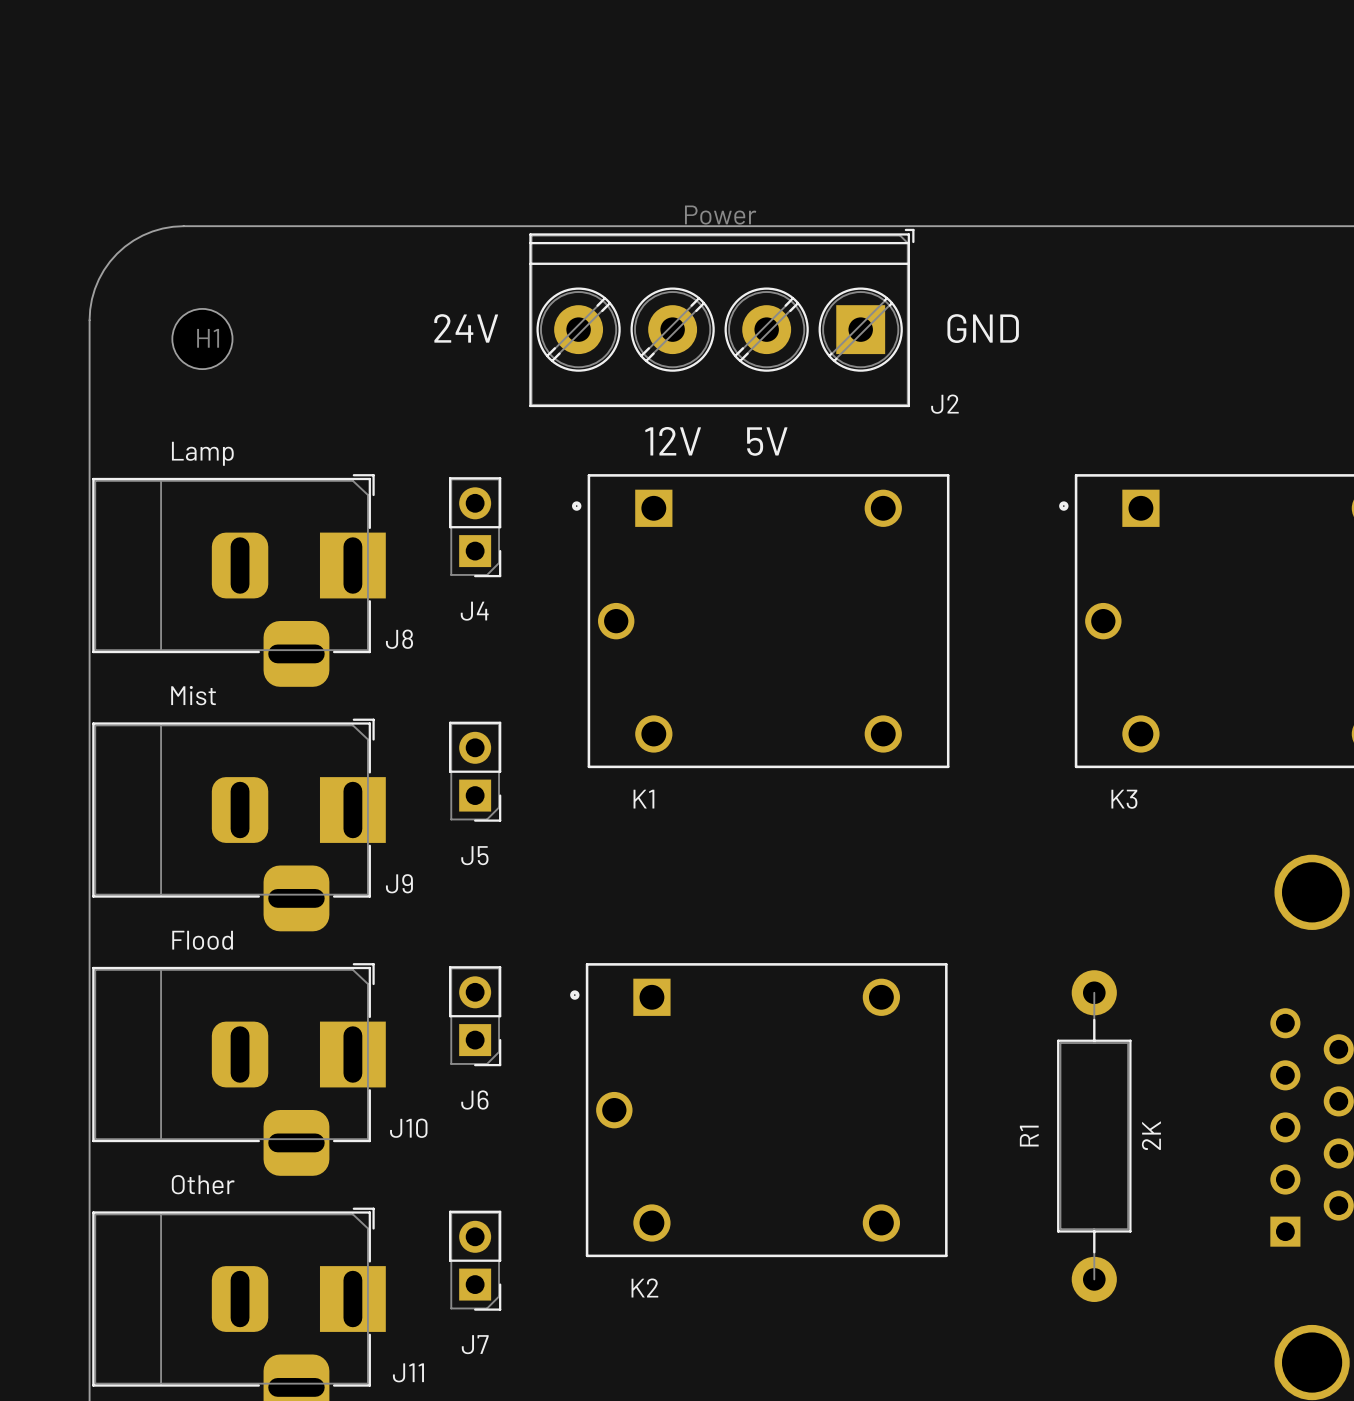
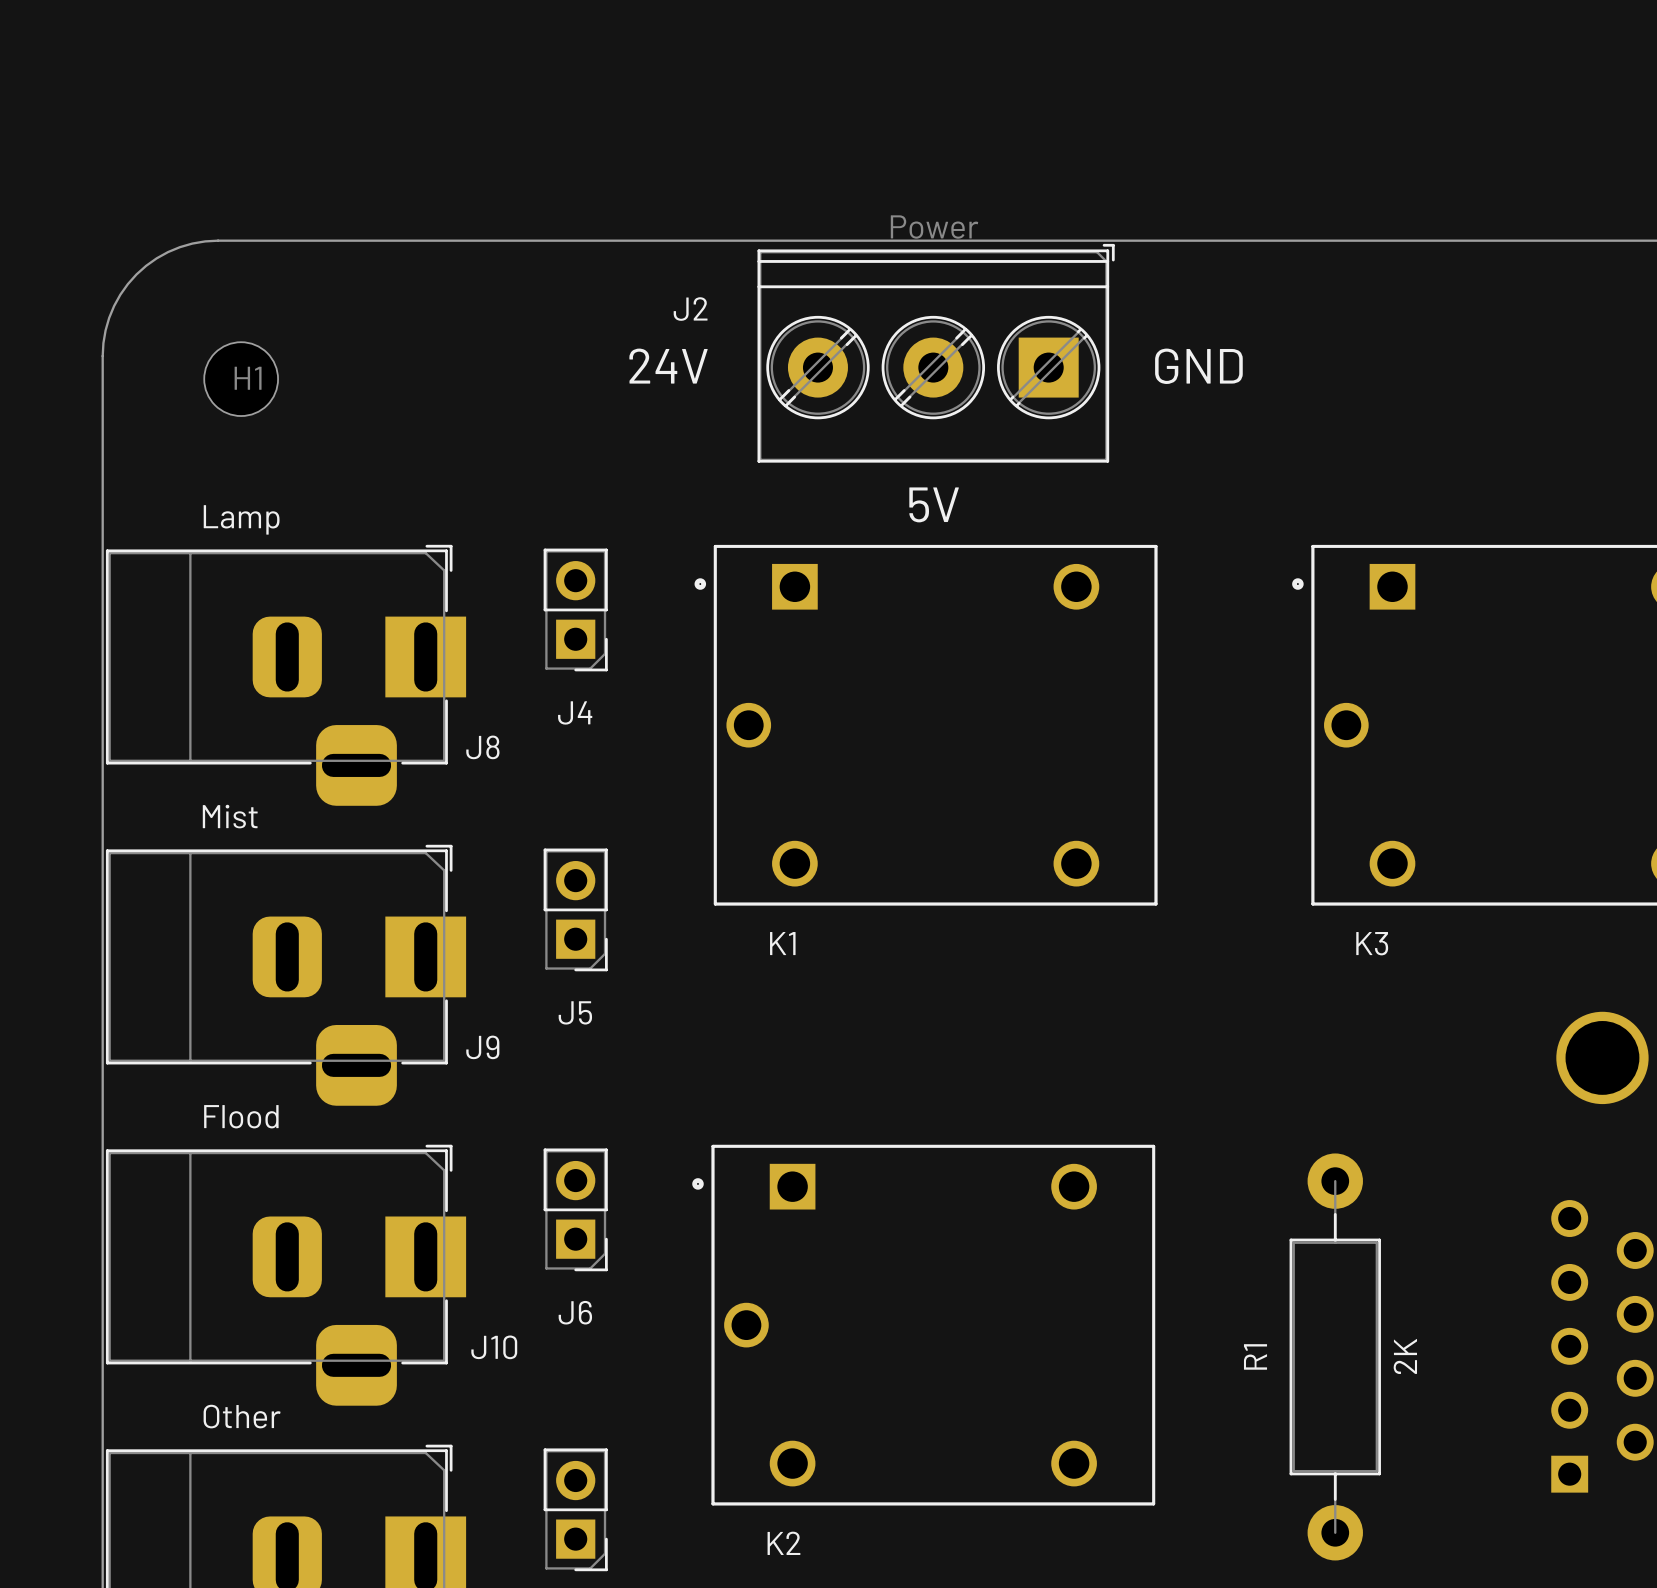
J2 footprint: [529, 228, 915, 408] -> [757, 243, 1115, 463]
text position: 24V (466, 328) -> 24V (668, 366)
J2 name position: J2 (944, 404) -> J2 (690, 309)
text: 12V (673, 441) -> none

